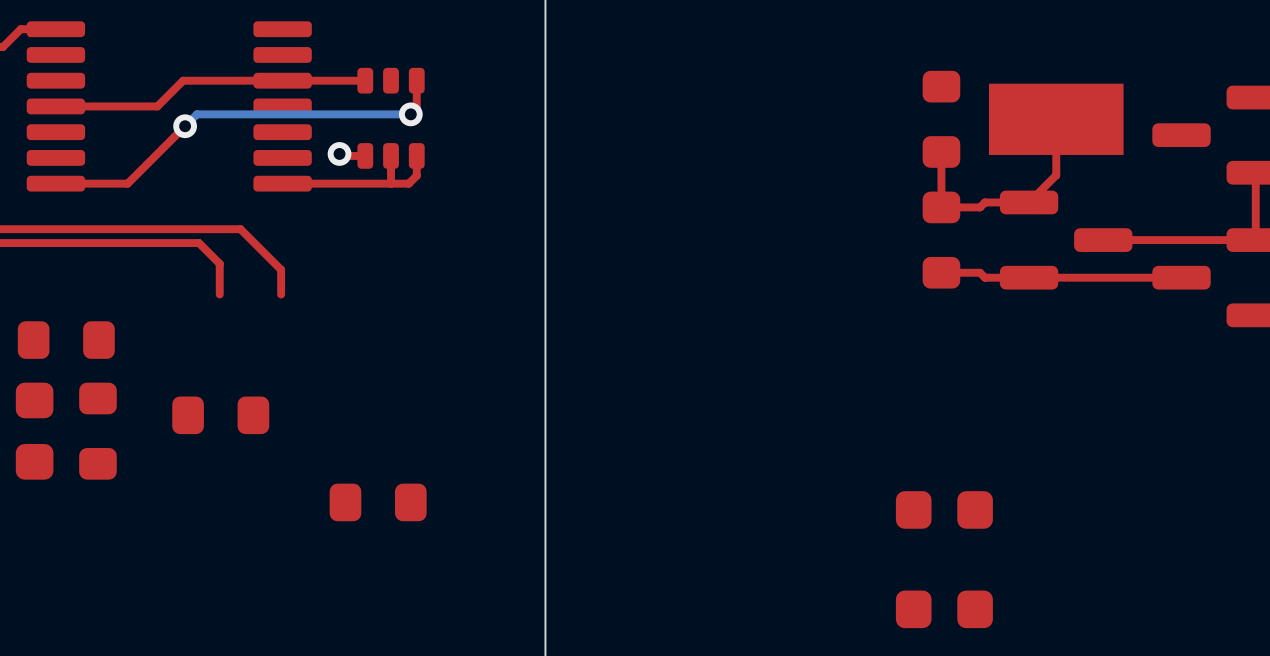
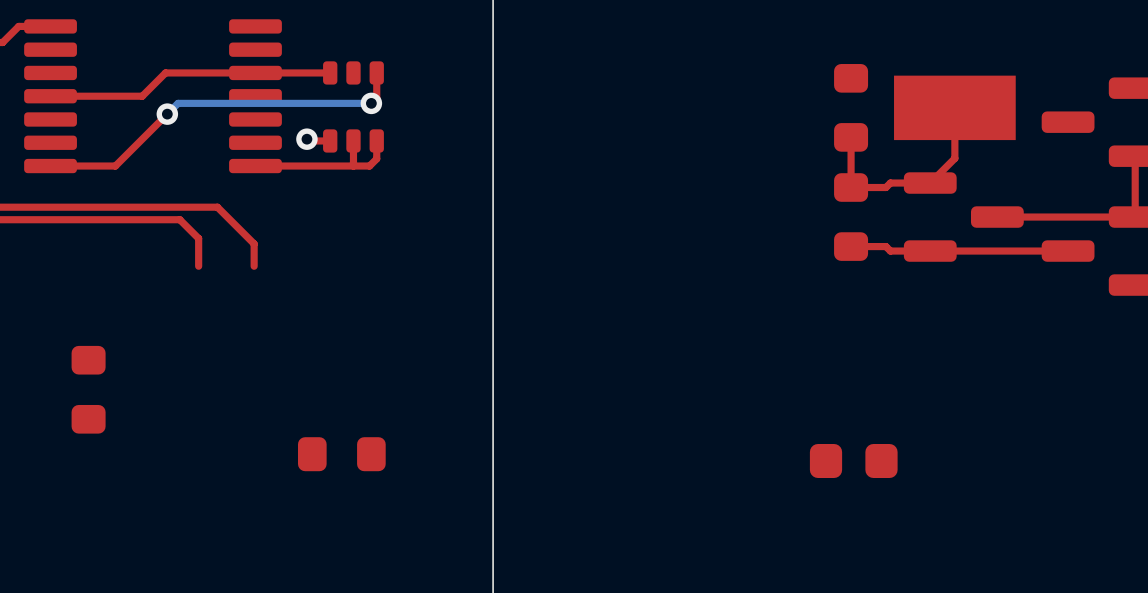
part: (66, 340) -> none
part: (220, 415) -> none
part: (34, 431) -> none
part: (944, 609) -> none

